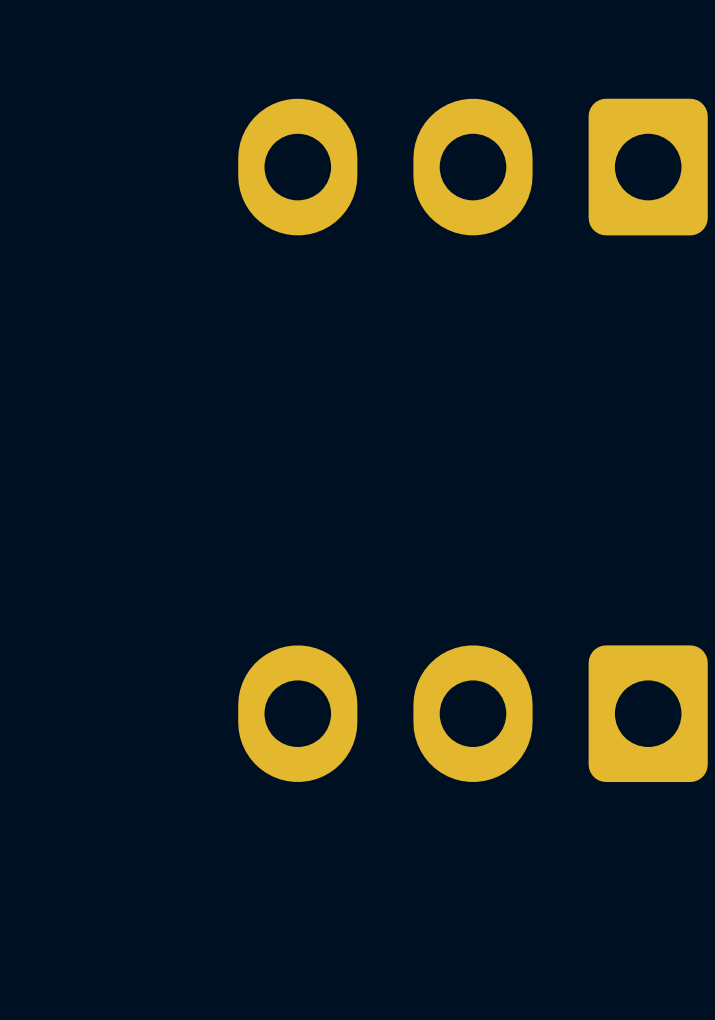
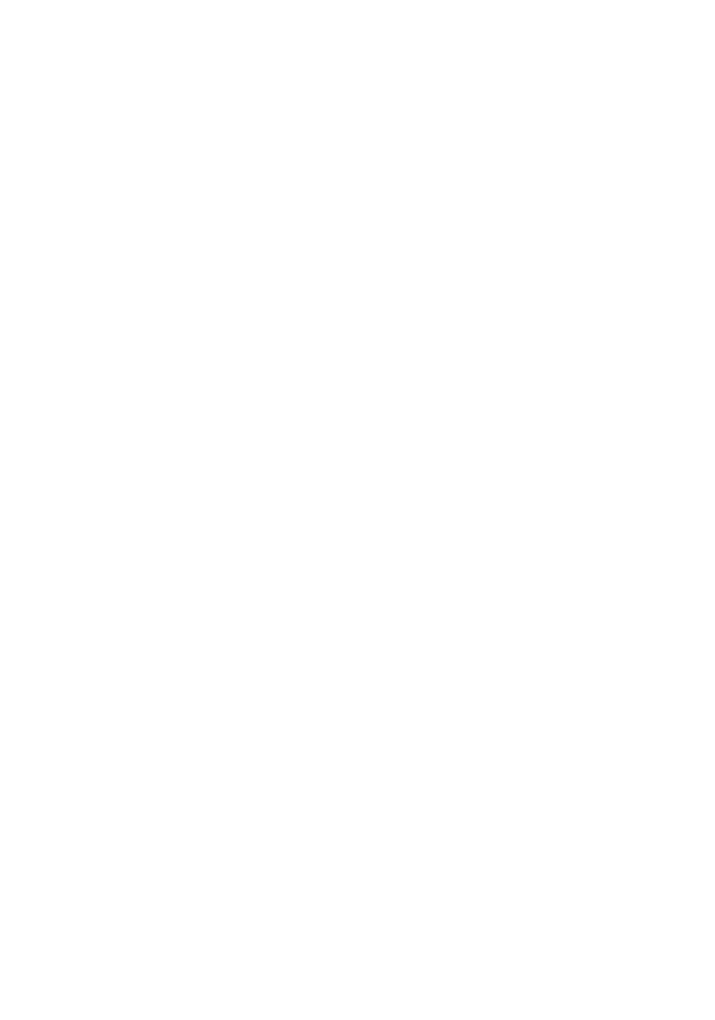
part: (472, 167) -> none
part: (472, 713) -> none

